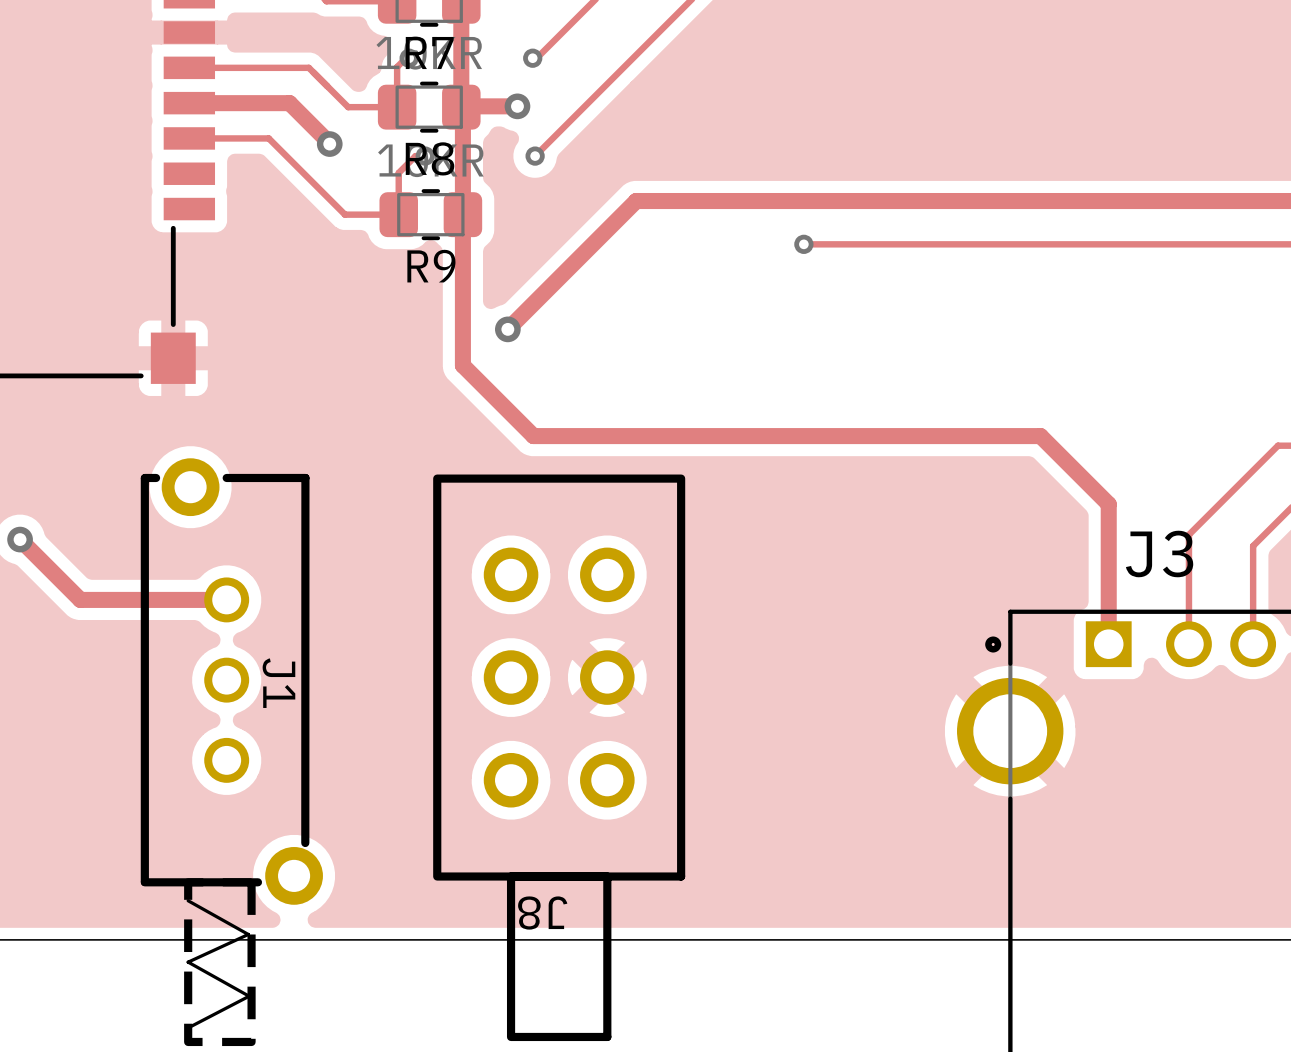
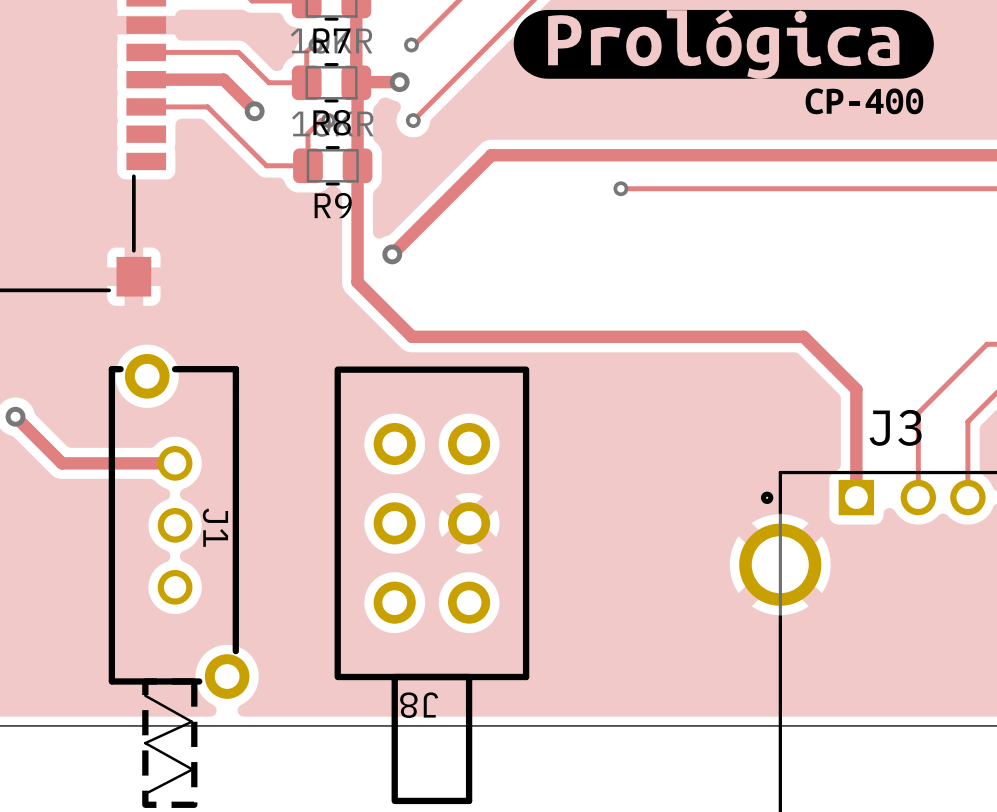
drawing: none -> [513, 9, 934, 115]

